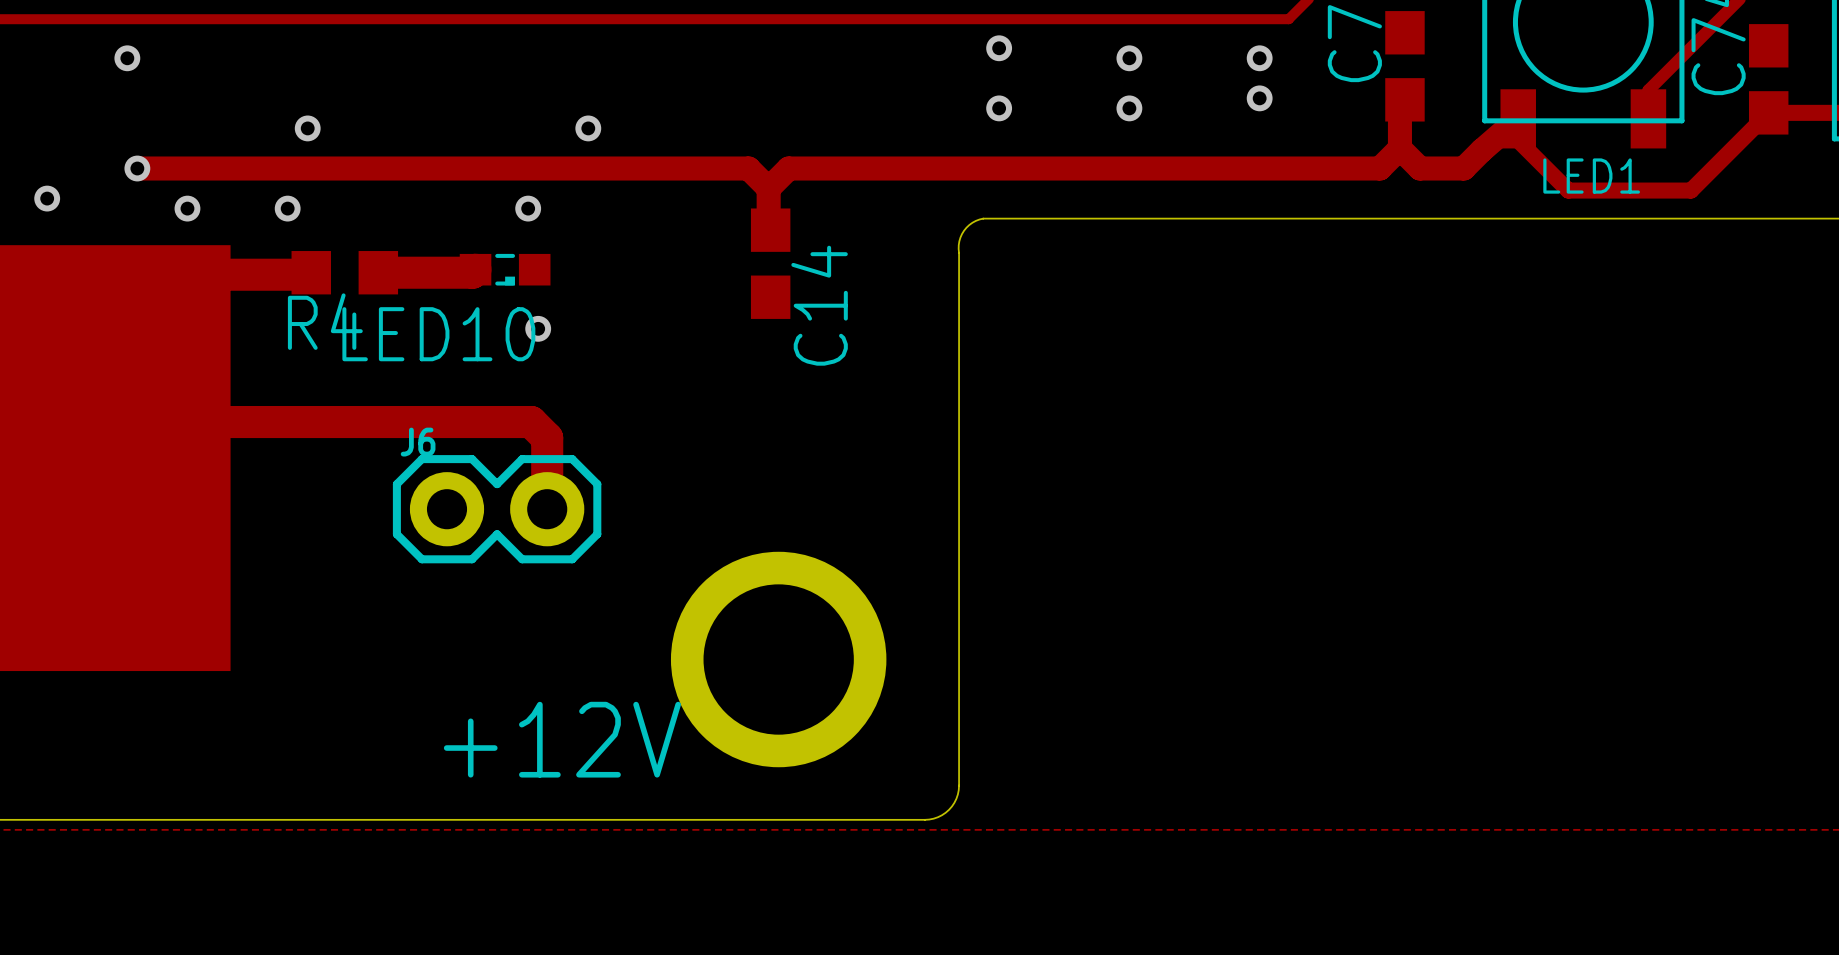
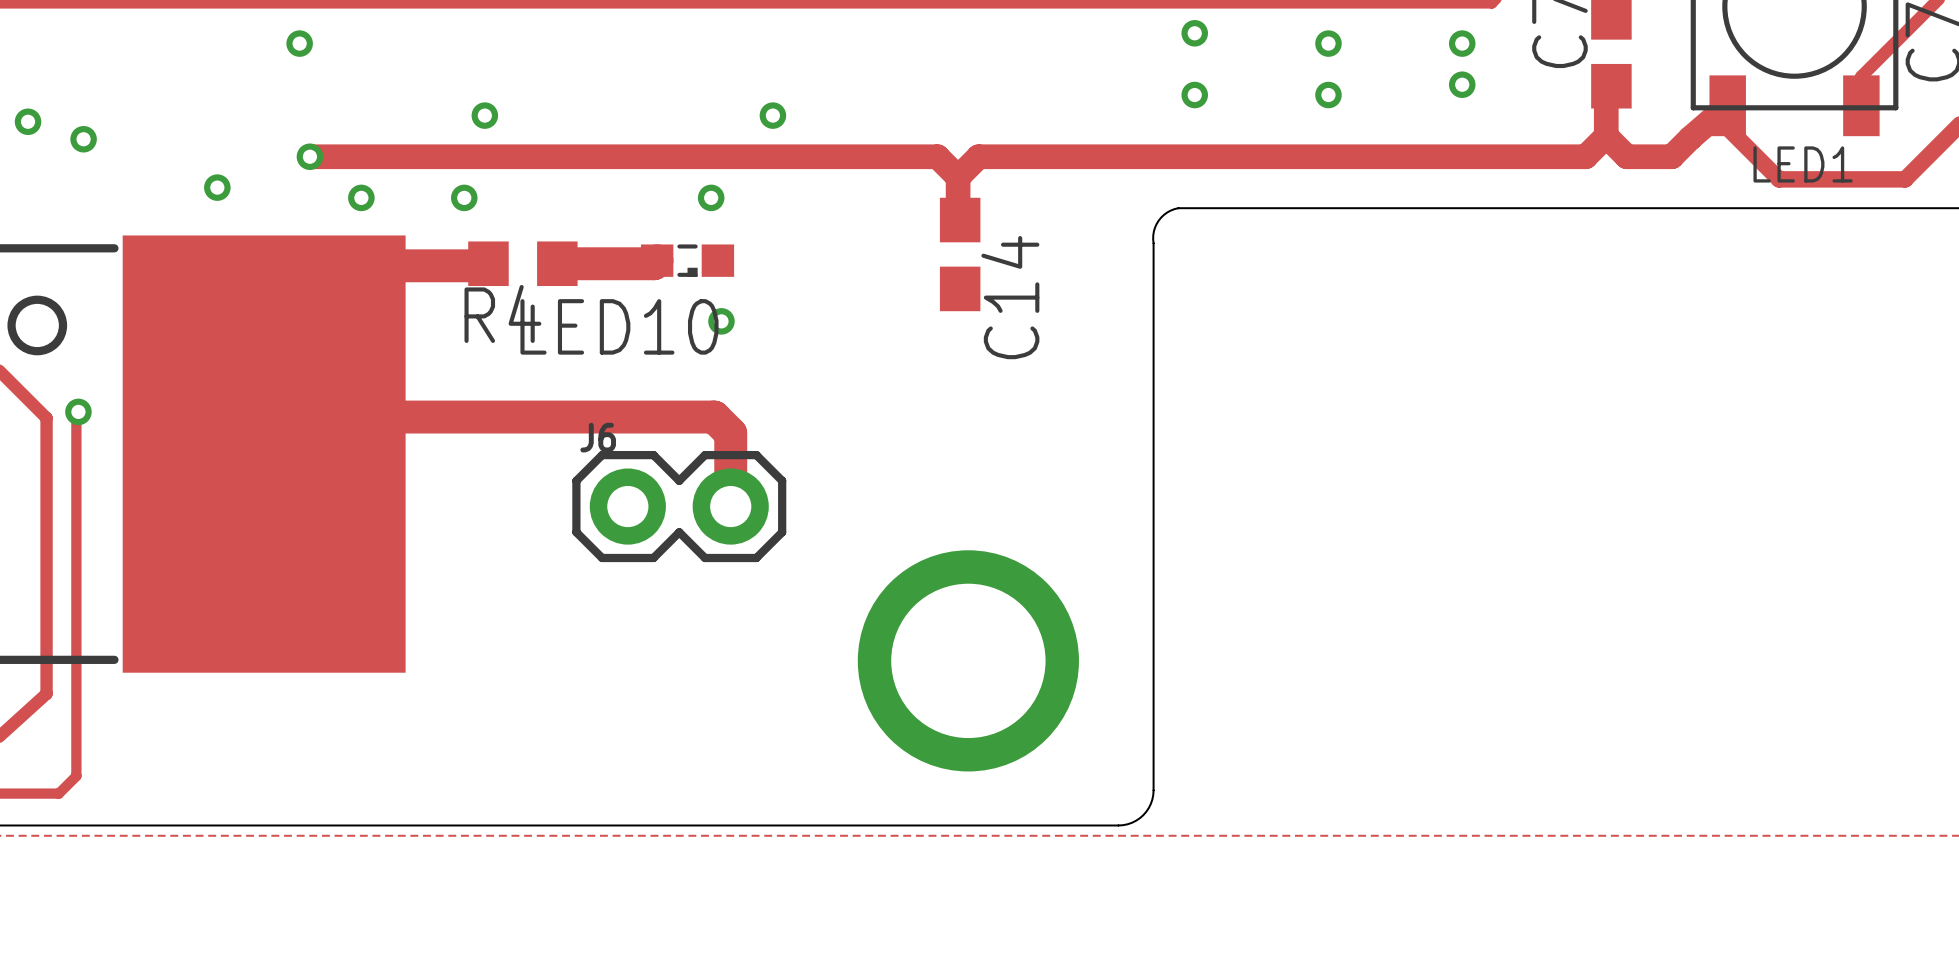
text: +12V (562, 739) -> none

